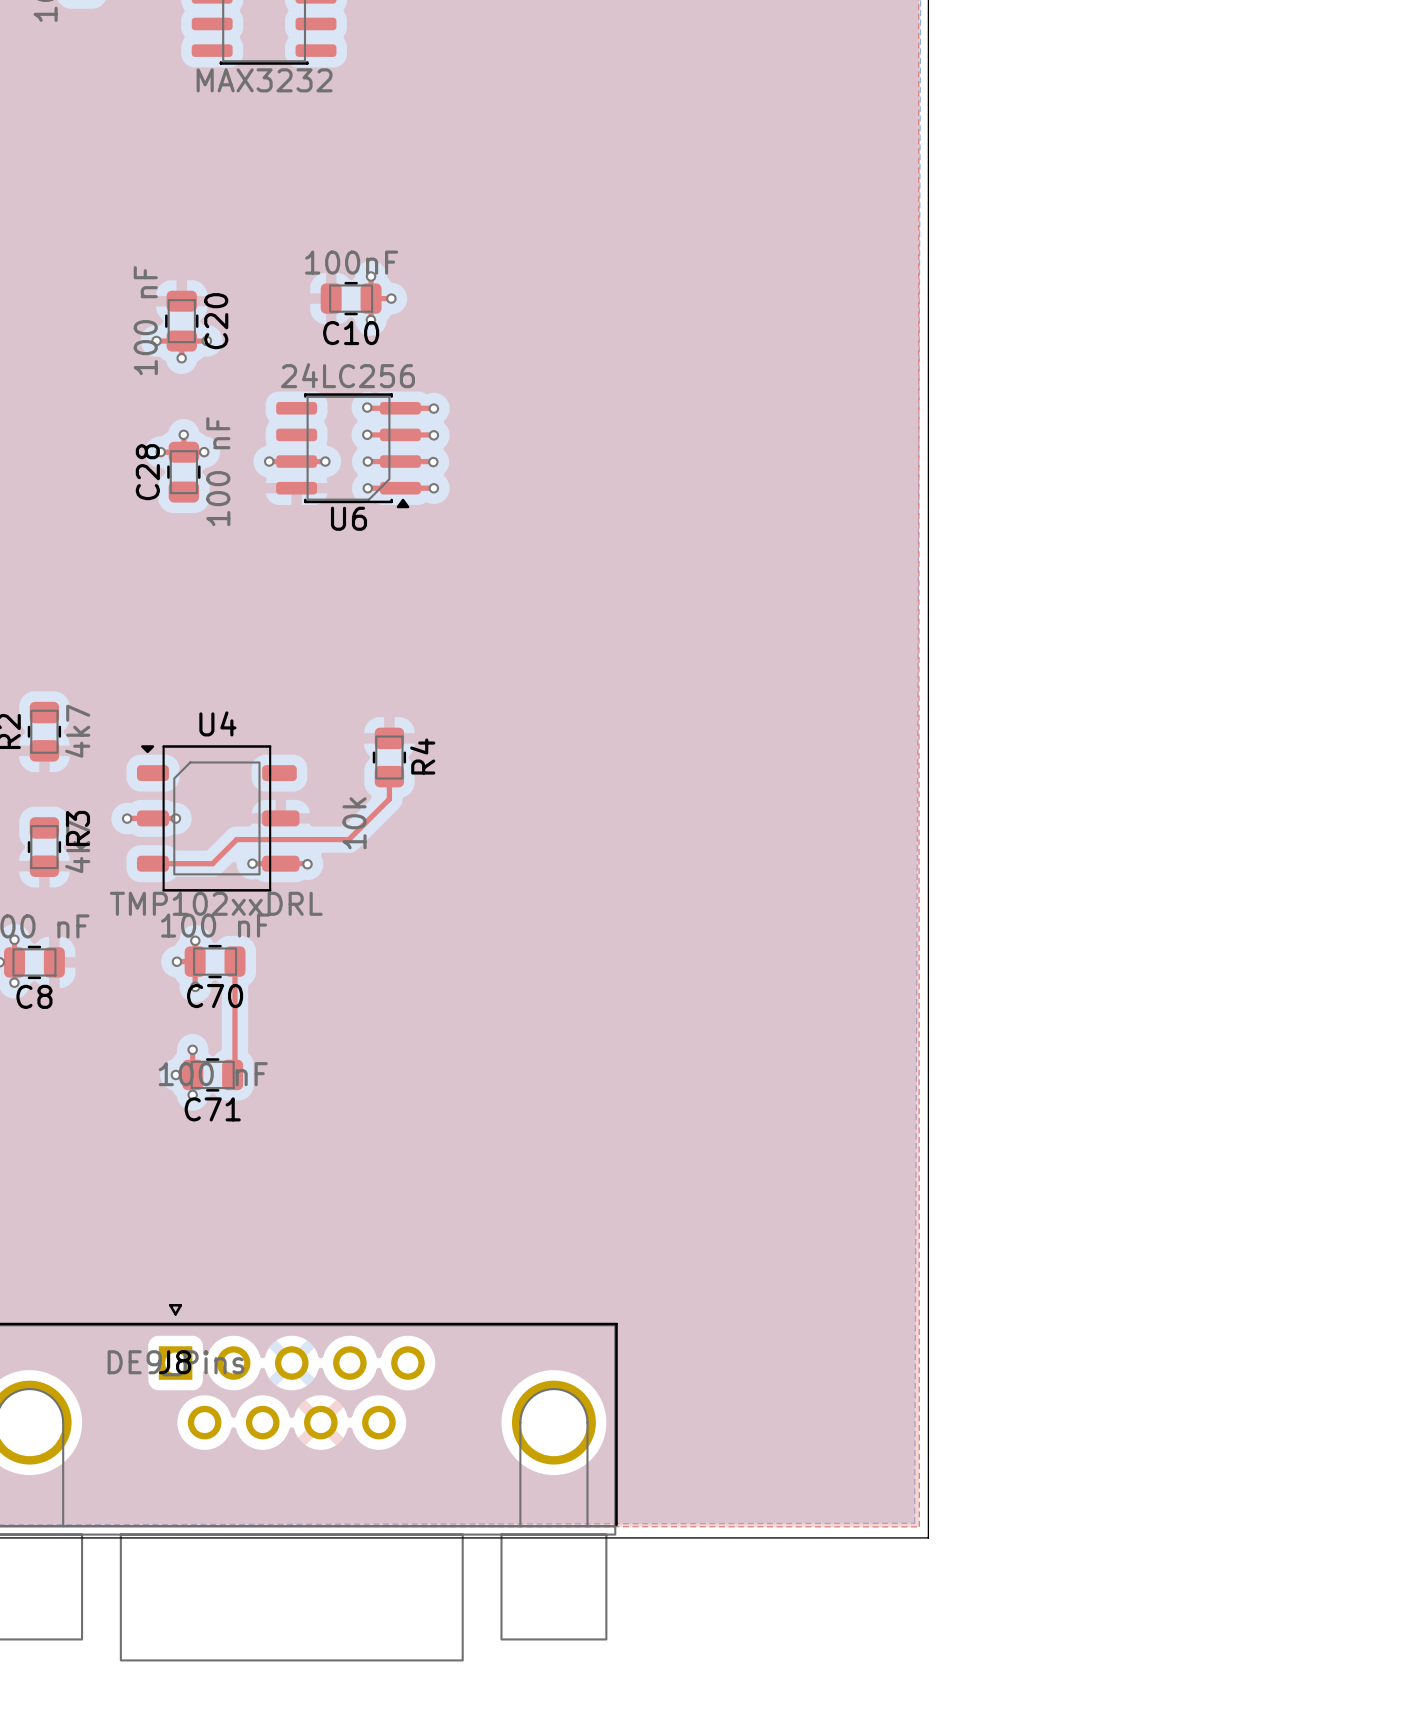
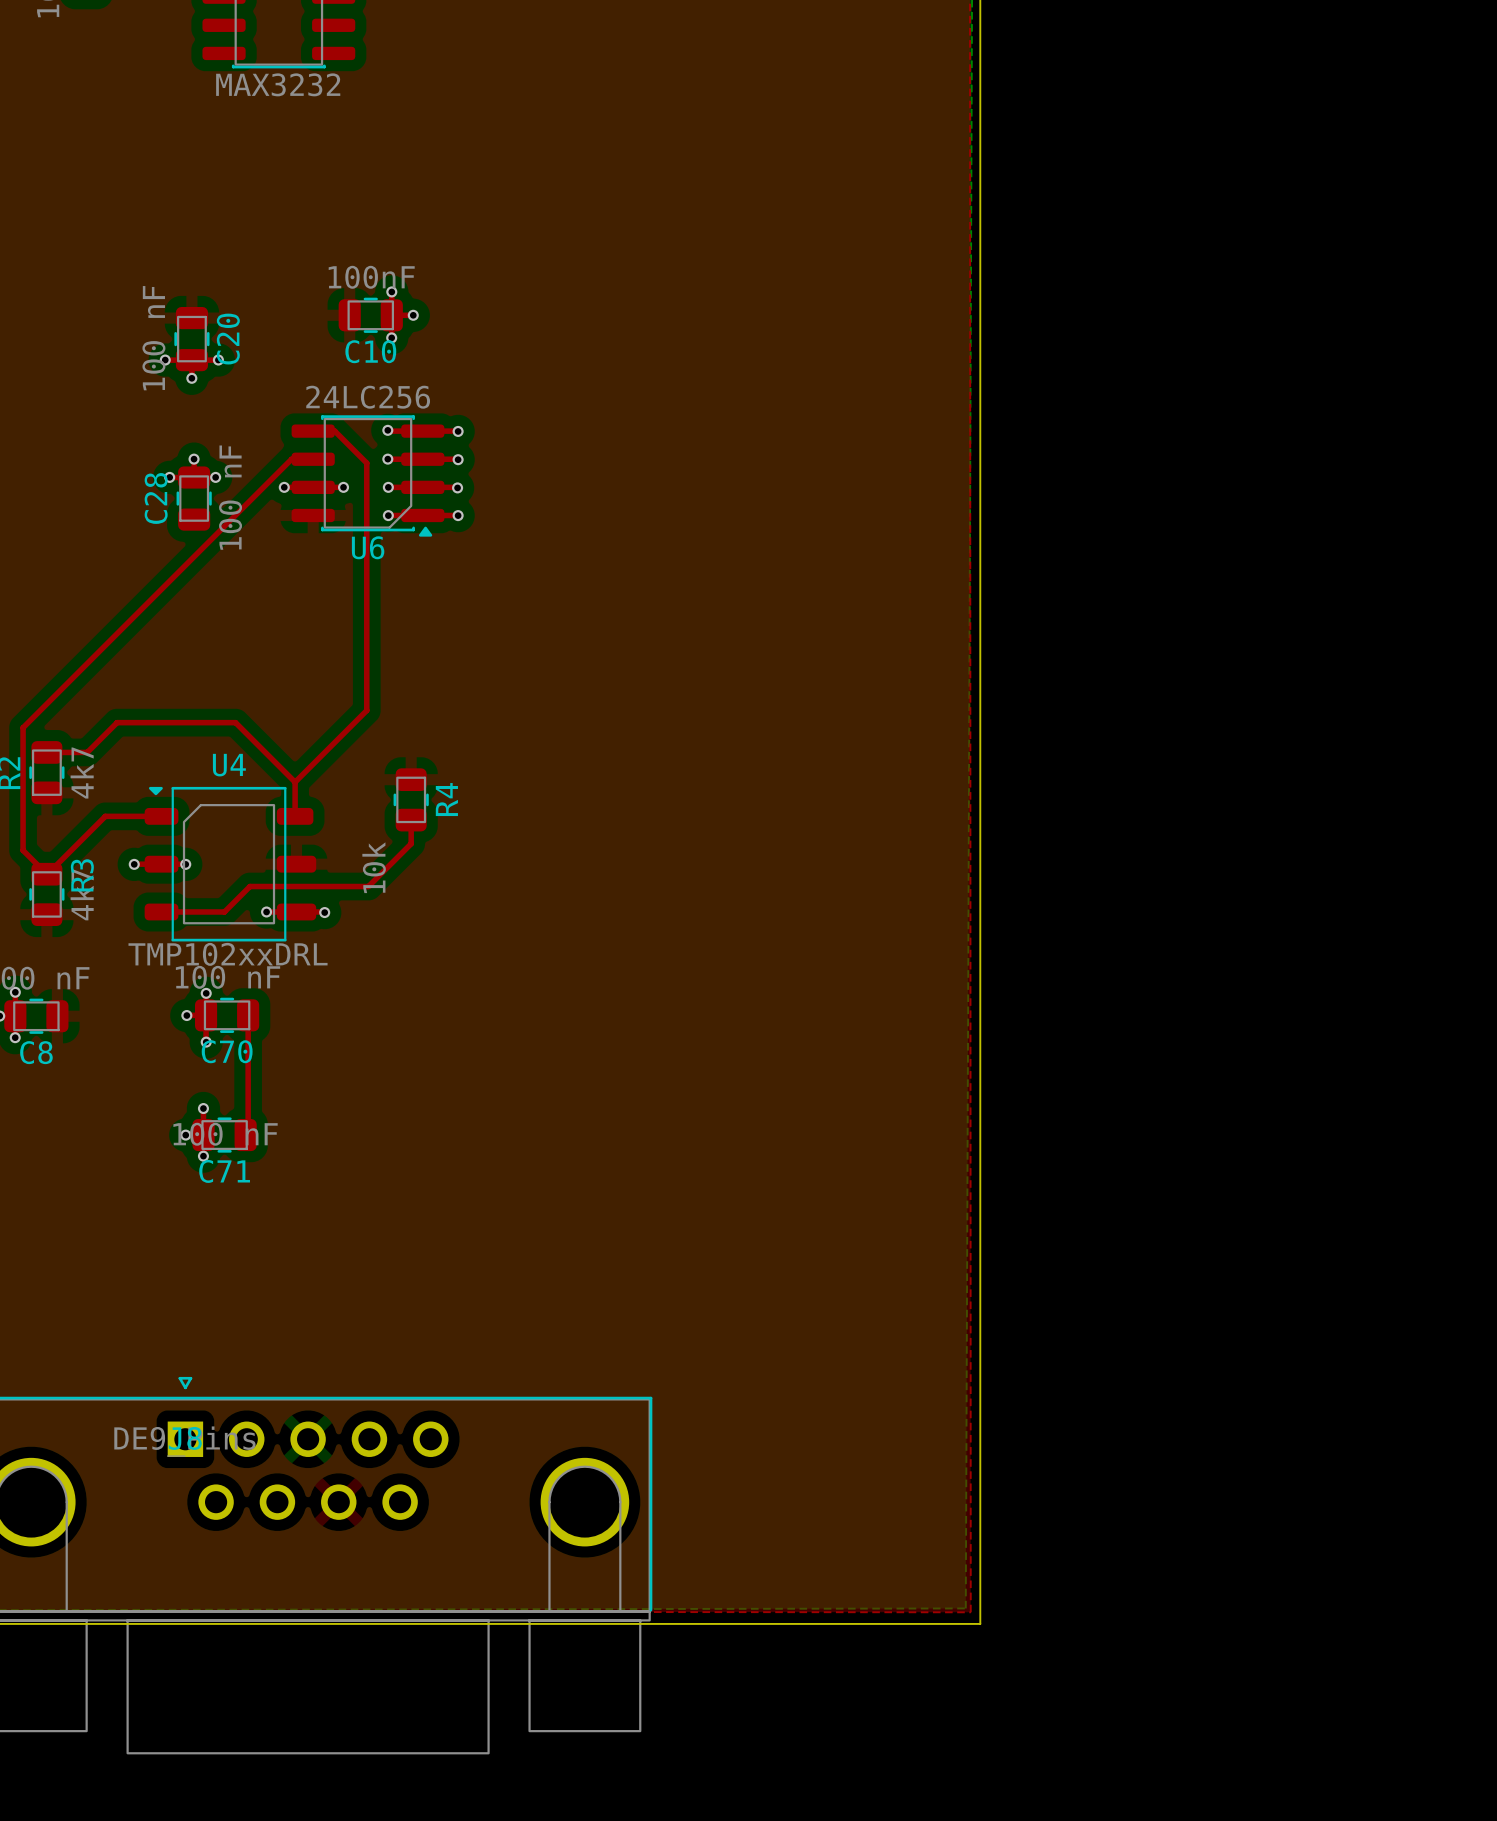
top track: none -> (313, 431) (334, 431) (366, 463) (366, 710) (295, 782)
top track: none -> (313, 459) (291, 459) (23, 727) (23, 850) (46, 874) (105, 816) (161, 816)
top track: none -> (46, 752) (87, 752) (117, 722) (235, 722) (295, 782)
top track: none -> (295, 782) (295, 816)

